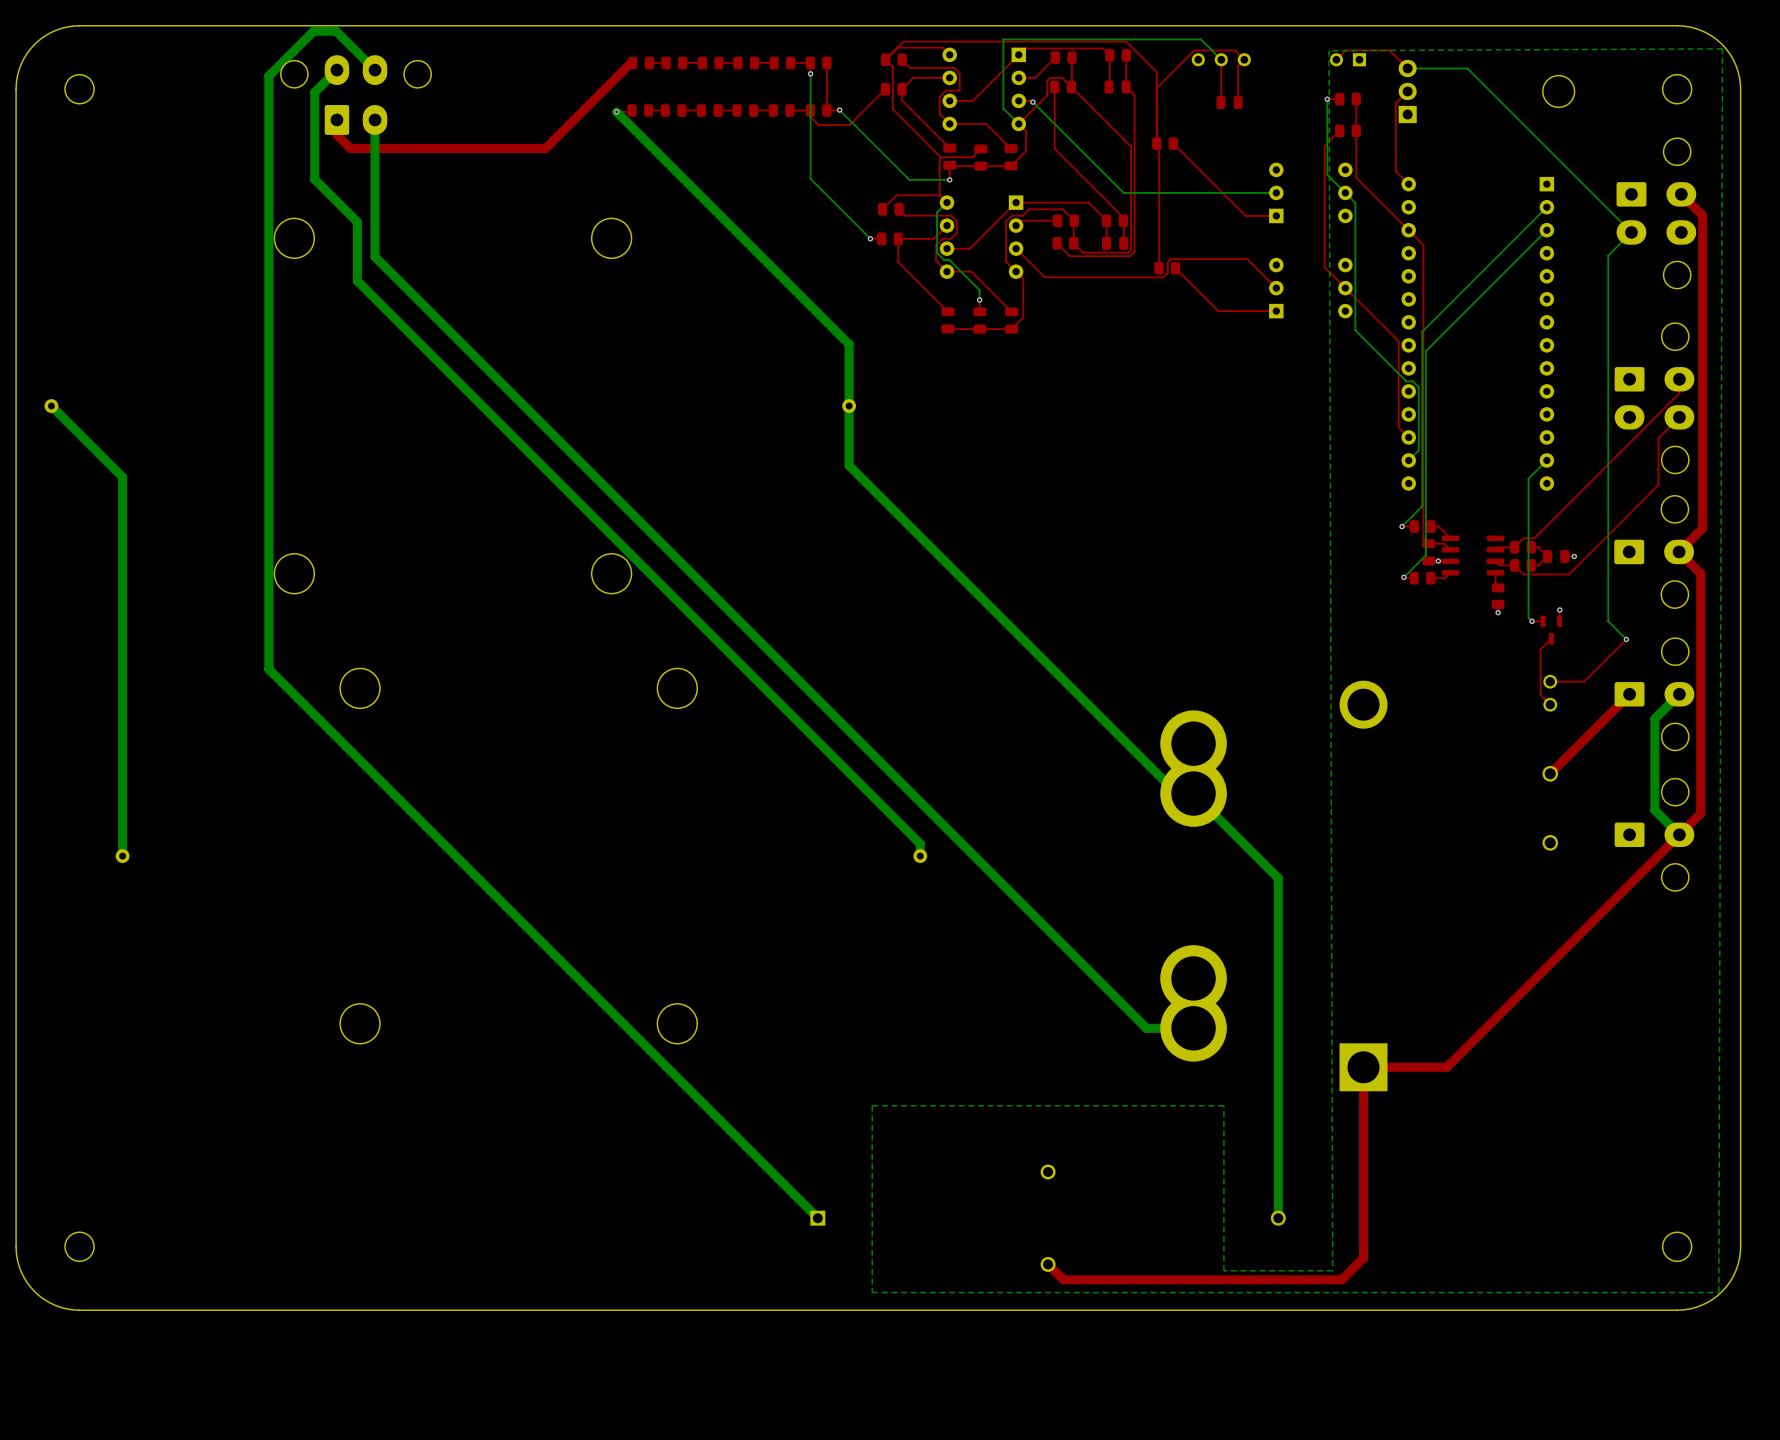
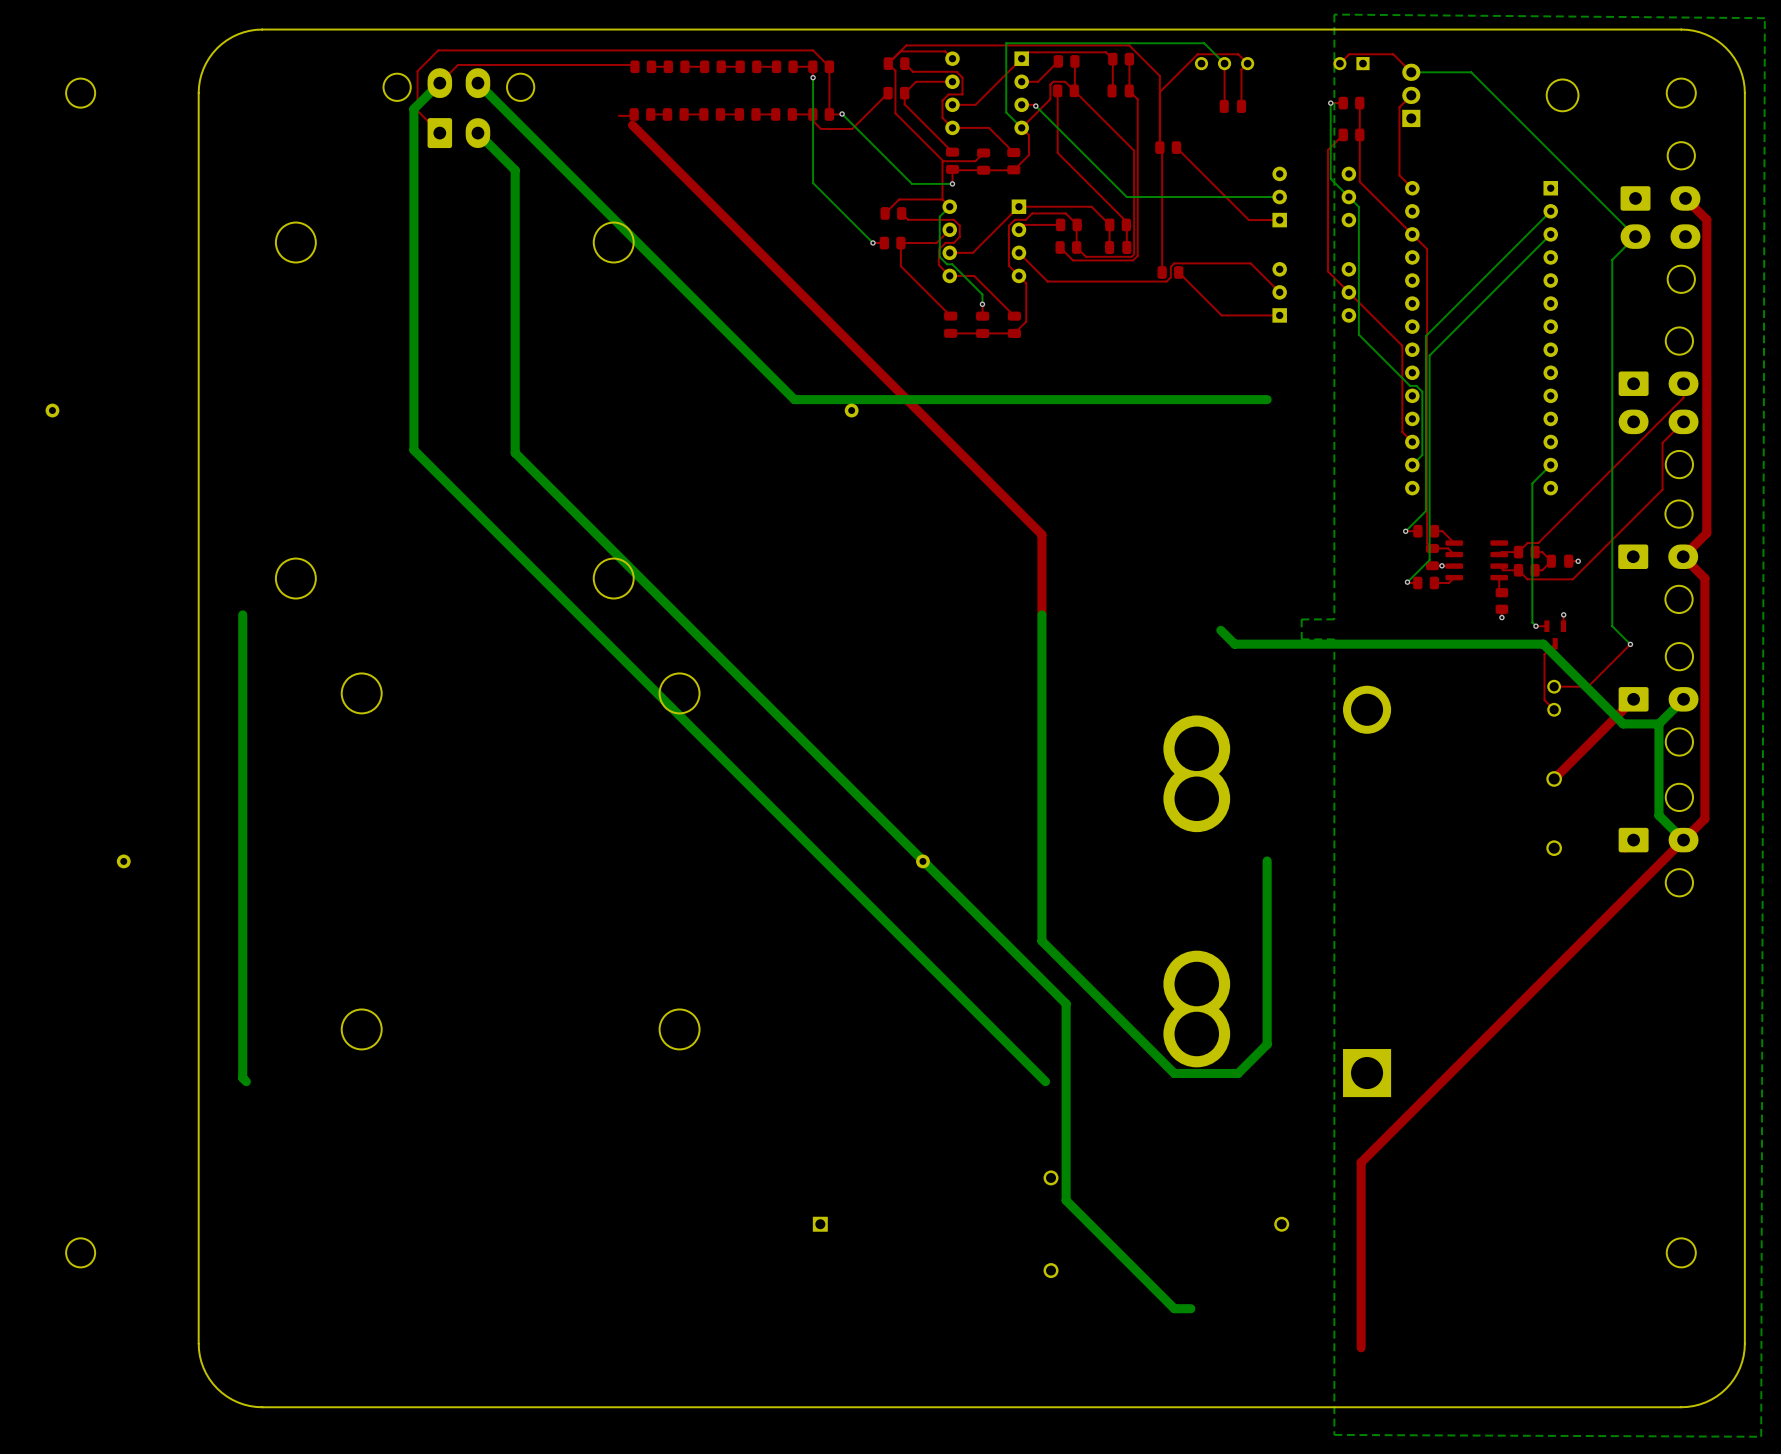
bottom zone outline: none -> (1334, 14) (1764, 18) (1761, 1436) (1334, 1434) (1334, 639) (1301, 639) (1301, 619) (1334, 619) (1334, 14)
board edge: (260, 25) (67, 26) (49, 33) (34, 44) (23, 59) (17, 76) (16, 1246) (18, 1265) (23, 1276) (39, 1295) (55, 1305) (79, 1310) (1677, 1310) (1701, 1305) (1722, 1291) (1735, 1271) (1740, 1246) -> (262, 29) (237, 34) (217, 48) (203, 68) (198, 93) (198, 1343) (201, 1362) (206, 1373) (221, 1392) (237, 1402) (262, 1407) (1687, 1406) (1705, 1402) (1721, 1392) (1730, 1384) (1740, 1368) (1744, 1343) (1744, 1252)
bottom zone outline: (1722, 48) (1718, 1292) (872, 1292) (872, 1105) (1223, 1105) (1223, 1270) (1332, 1270) (1329, 50) (1722, 48) -> none
top track: (631, 62) (545, 148) (350, 148) (336, 134) (336, 119) -> none
top track: none -> (634, 66) (633, 64) (457, 64) (439, 83)
top track: none -> (829, 66) (813, 50) (438, 50) (417, 71) (417, 110) (439, 133)
bottom track: (336, 70) (314, 92) (314, 179) (357, 222) (357, 280) (920, 843) (920, 856) -> none
bottom track: (375, 70) (336, 31) (313, 31) (268, 76) (268, 669) (817, 1218) -> none
bottom track: none -> (439, 83) (413, 109) (413, 450) (1045, 1081)
bottom track: none -> (477, 83) (794, 399) (1267, 399)
part position: (355, 95) -> (458, 108)
bottom track: (616, 111) (849, 344) (849, 465) (1177, 793) (1193, 793) (1278, 878) (1278, 1218) -> none
via: (616, 111) -> none
bottom track: (375, 119) (375, 256) (1146, 1028) (1193, 1028) -> none
top track: none -> (632, 125) (1041, 534) (1041, 614)
bottom track: none -> (477, 133) (515, 170) (515, 452) (1066, 1003) (1066, 1200) (1174, 1308) (1190, 1308)
bottom track: (51, 406) (122, 477) (122, 856) -> none
bottom track: none -> (242, 614) (242, 1078) (246, 1081)
bottom track: none -> (1041, 614) (1041, 941) (1174, 1073) (1238, 1073) (1267, 1044) (1267, 860)
bottom track: none -> (1220, 630) (1234, 644) (1543, 644) (1623, 723) (1658, 723)
top track: (1446, 1067) (1363, 1067) (1363, 1258) (1341, 1279) (1063, 1279) (1048, 1264) -> (1450, 1073) (1361, 1162) (1361, 1347)

